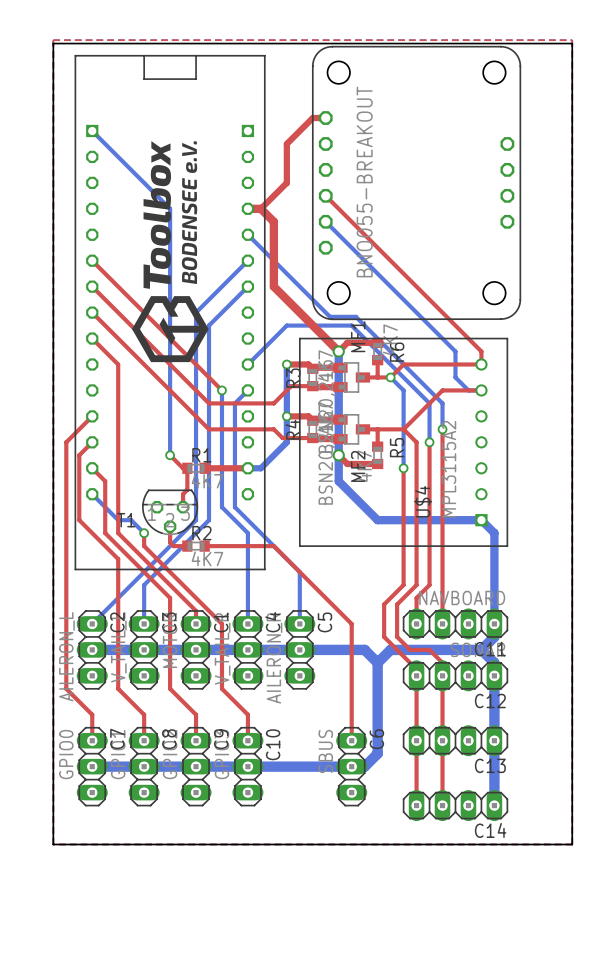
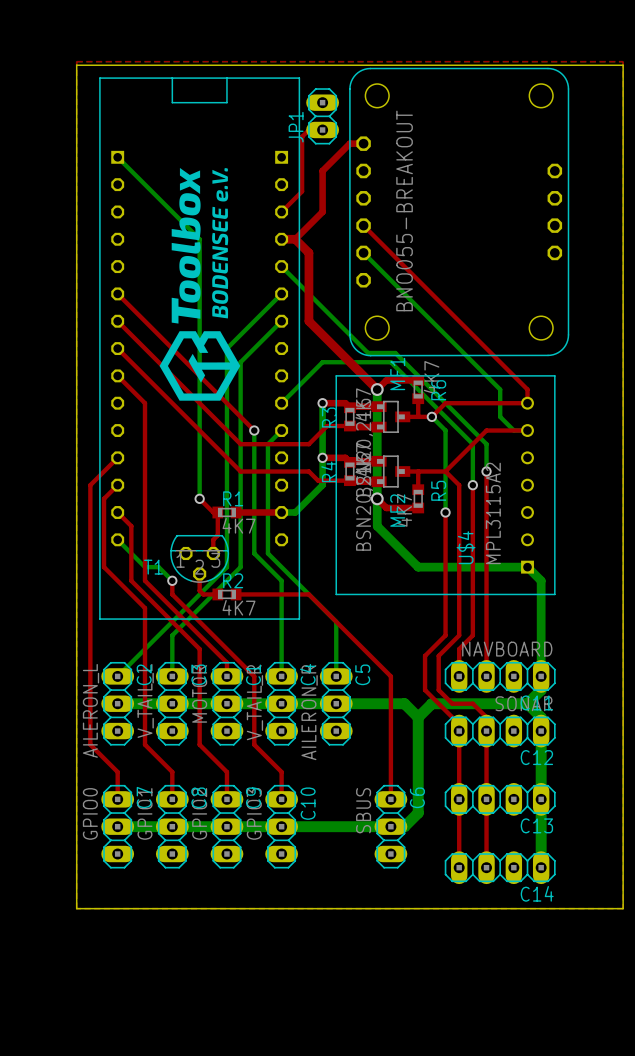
JP1: none -> (322, 116)
top track: none -> (322, 129) (308, 129) (302, 136) (302, 191) (281, 211)

